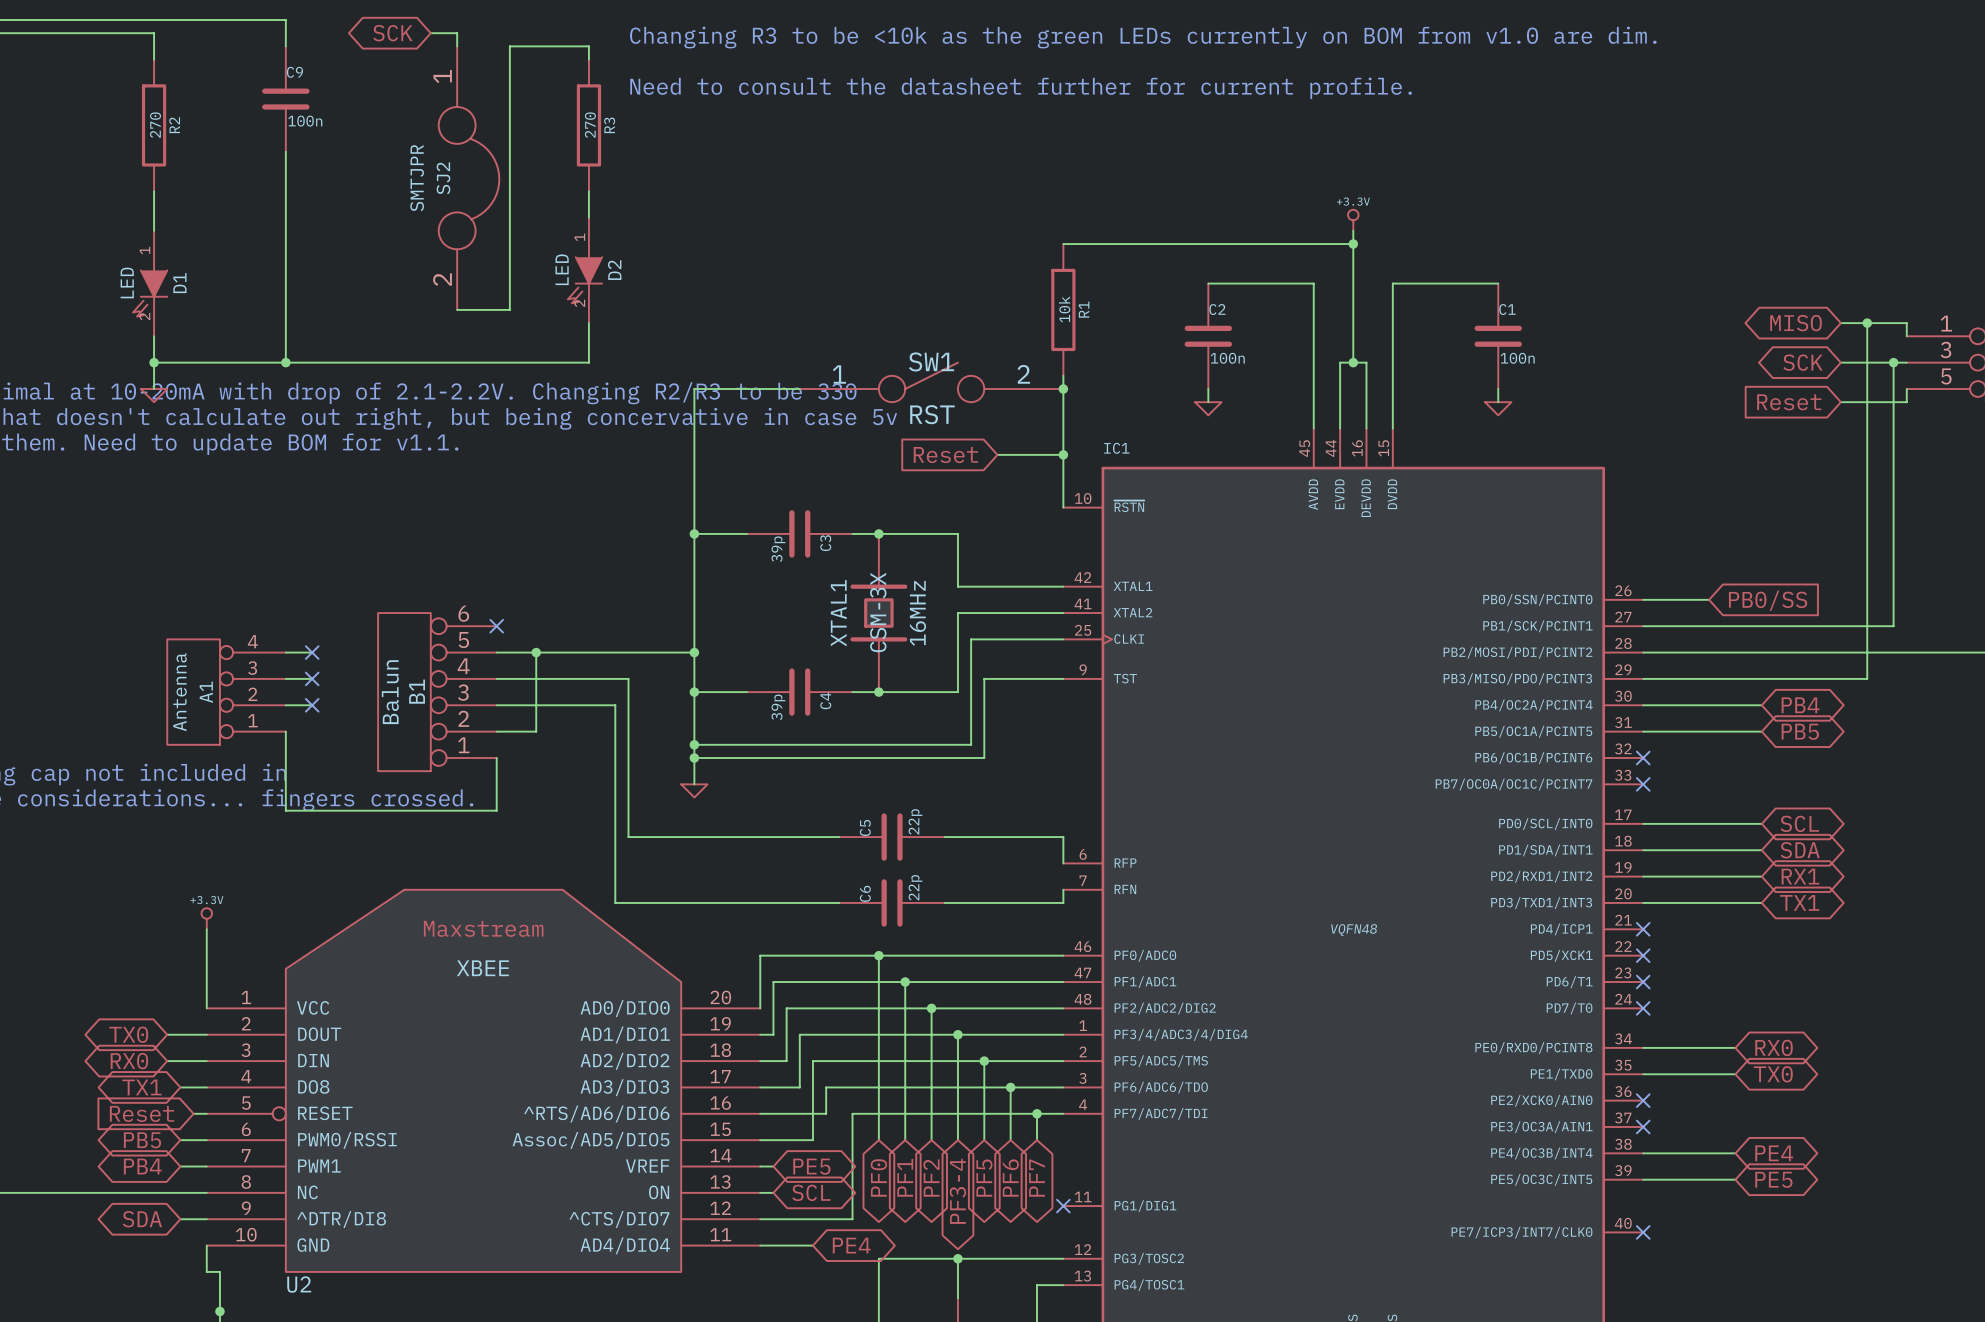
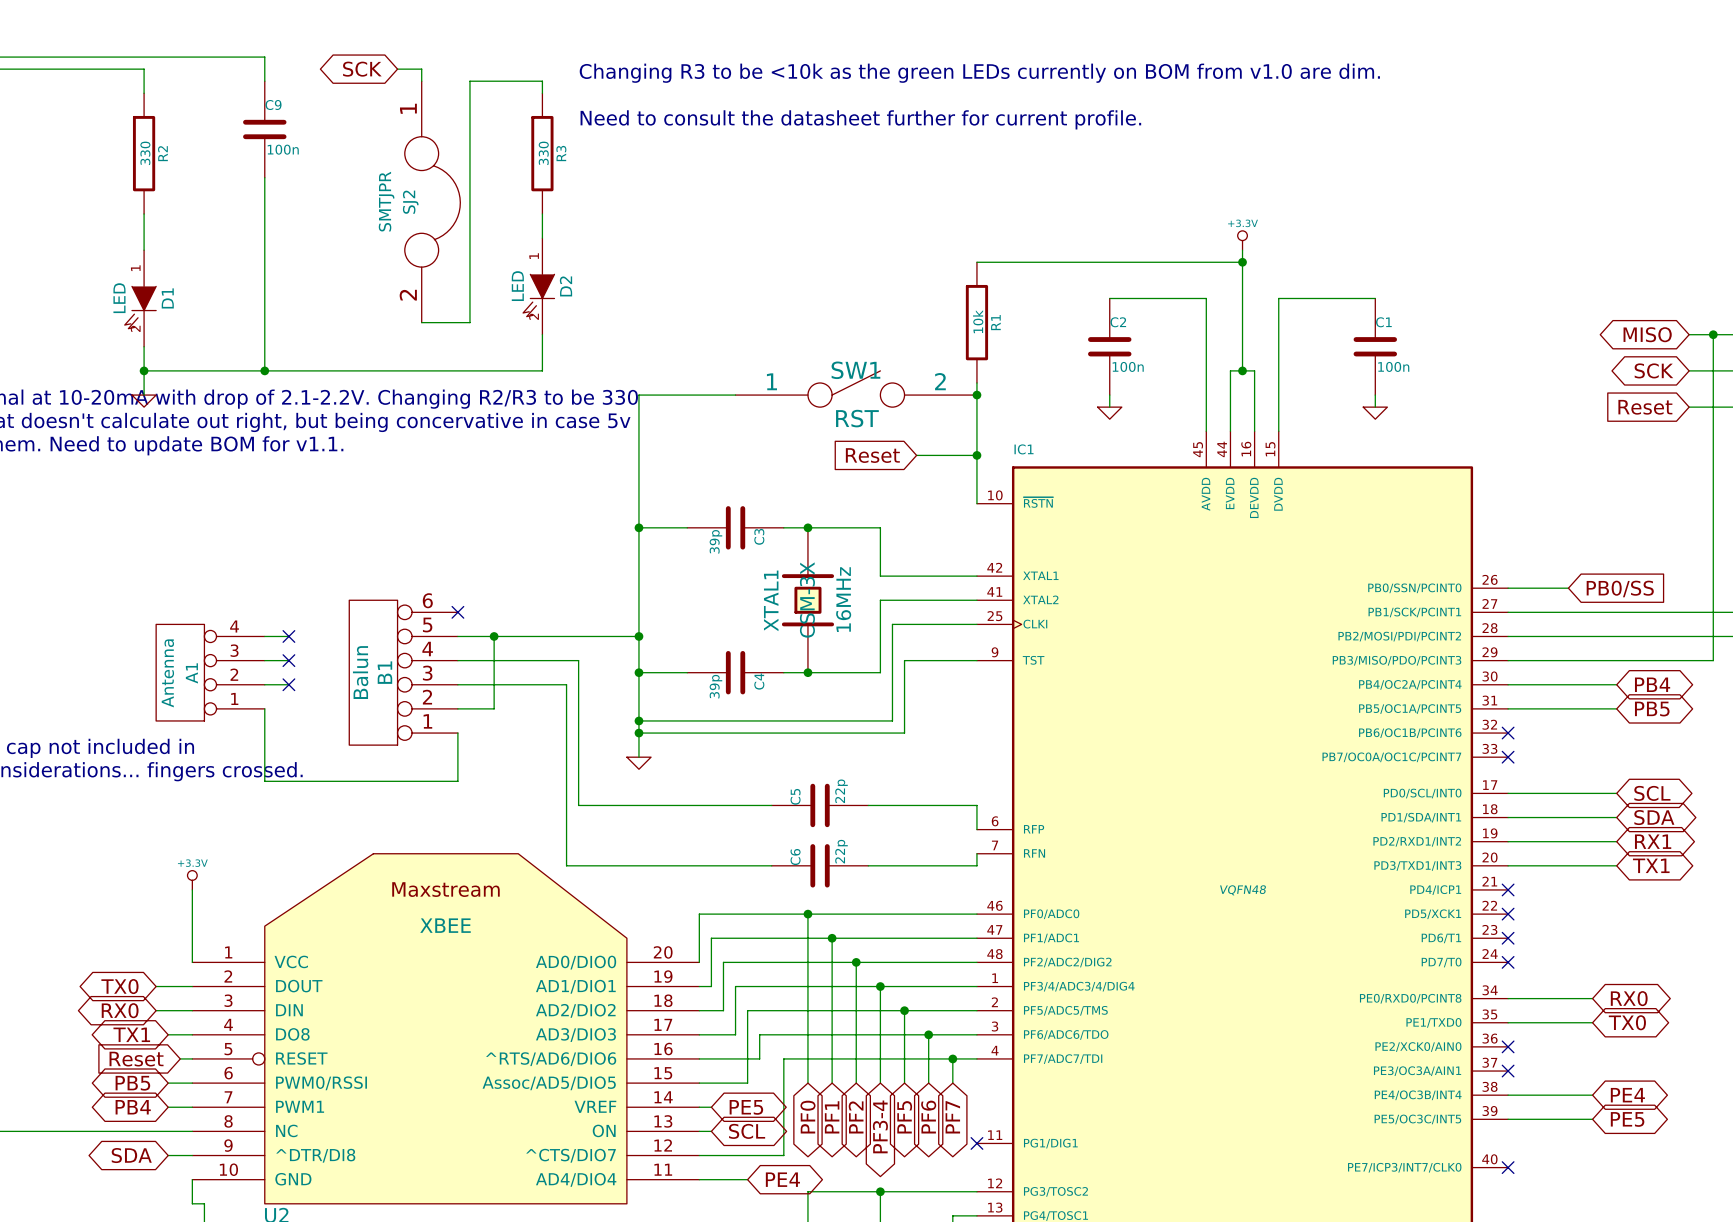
R2 value: 270 (155, 125) -> 330 (145, 153)
R3 value: 270 (590, 125) -> 330 (543, 153)

